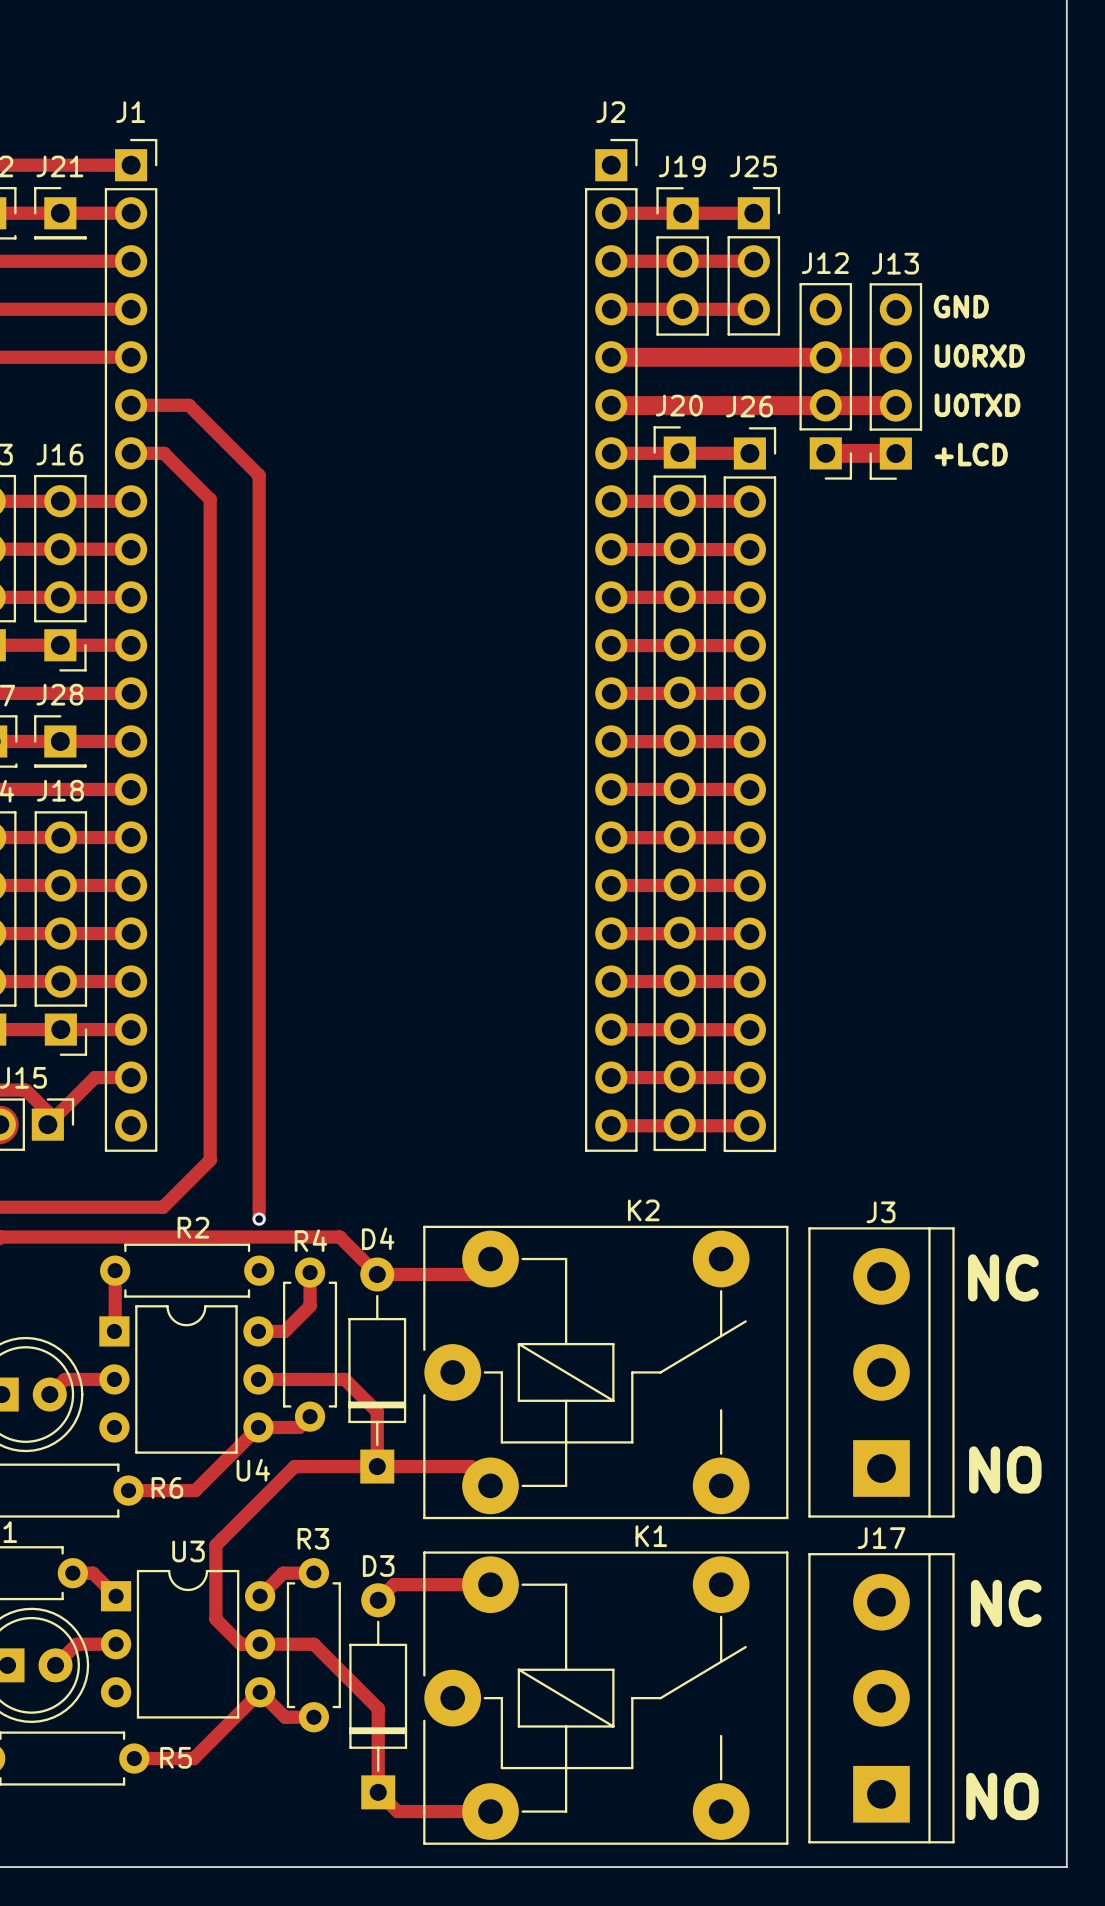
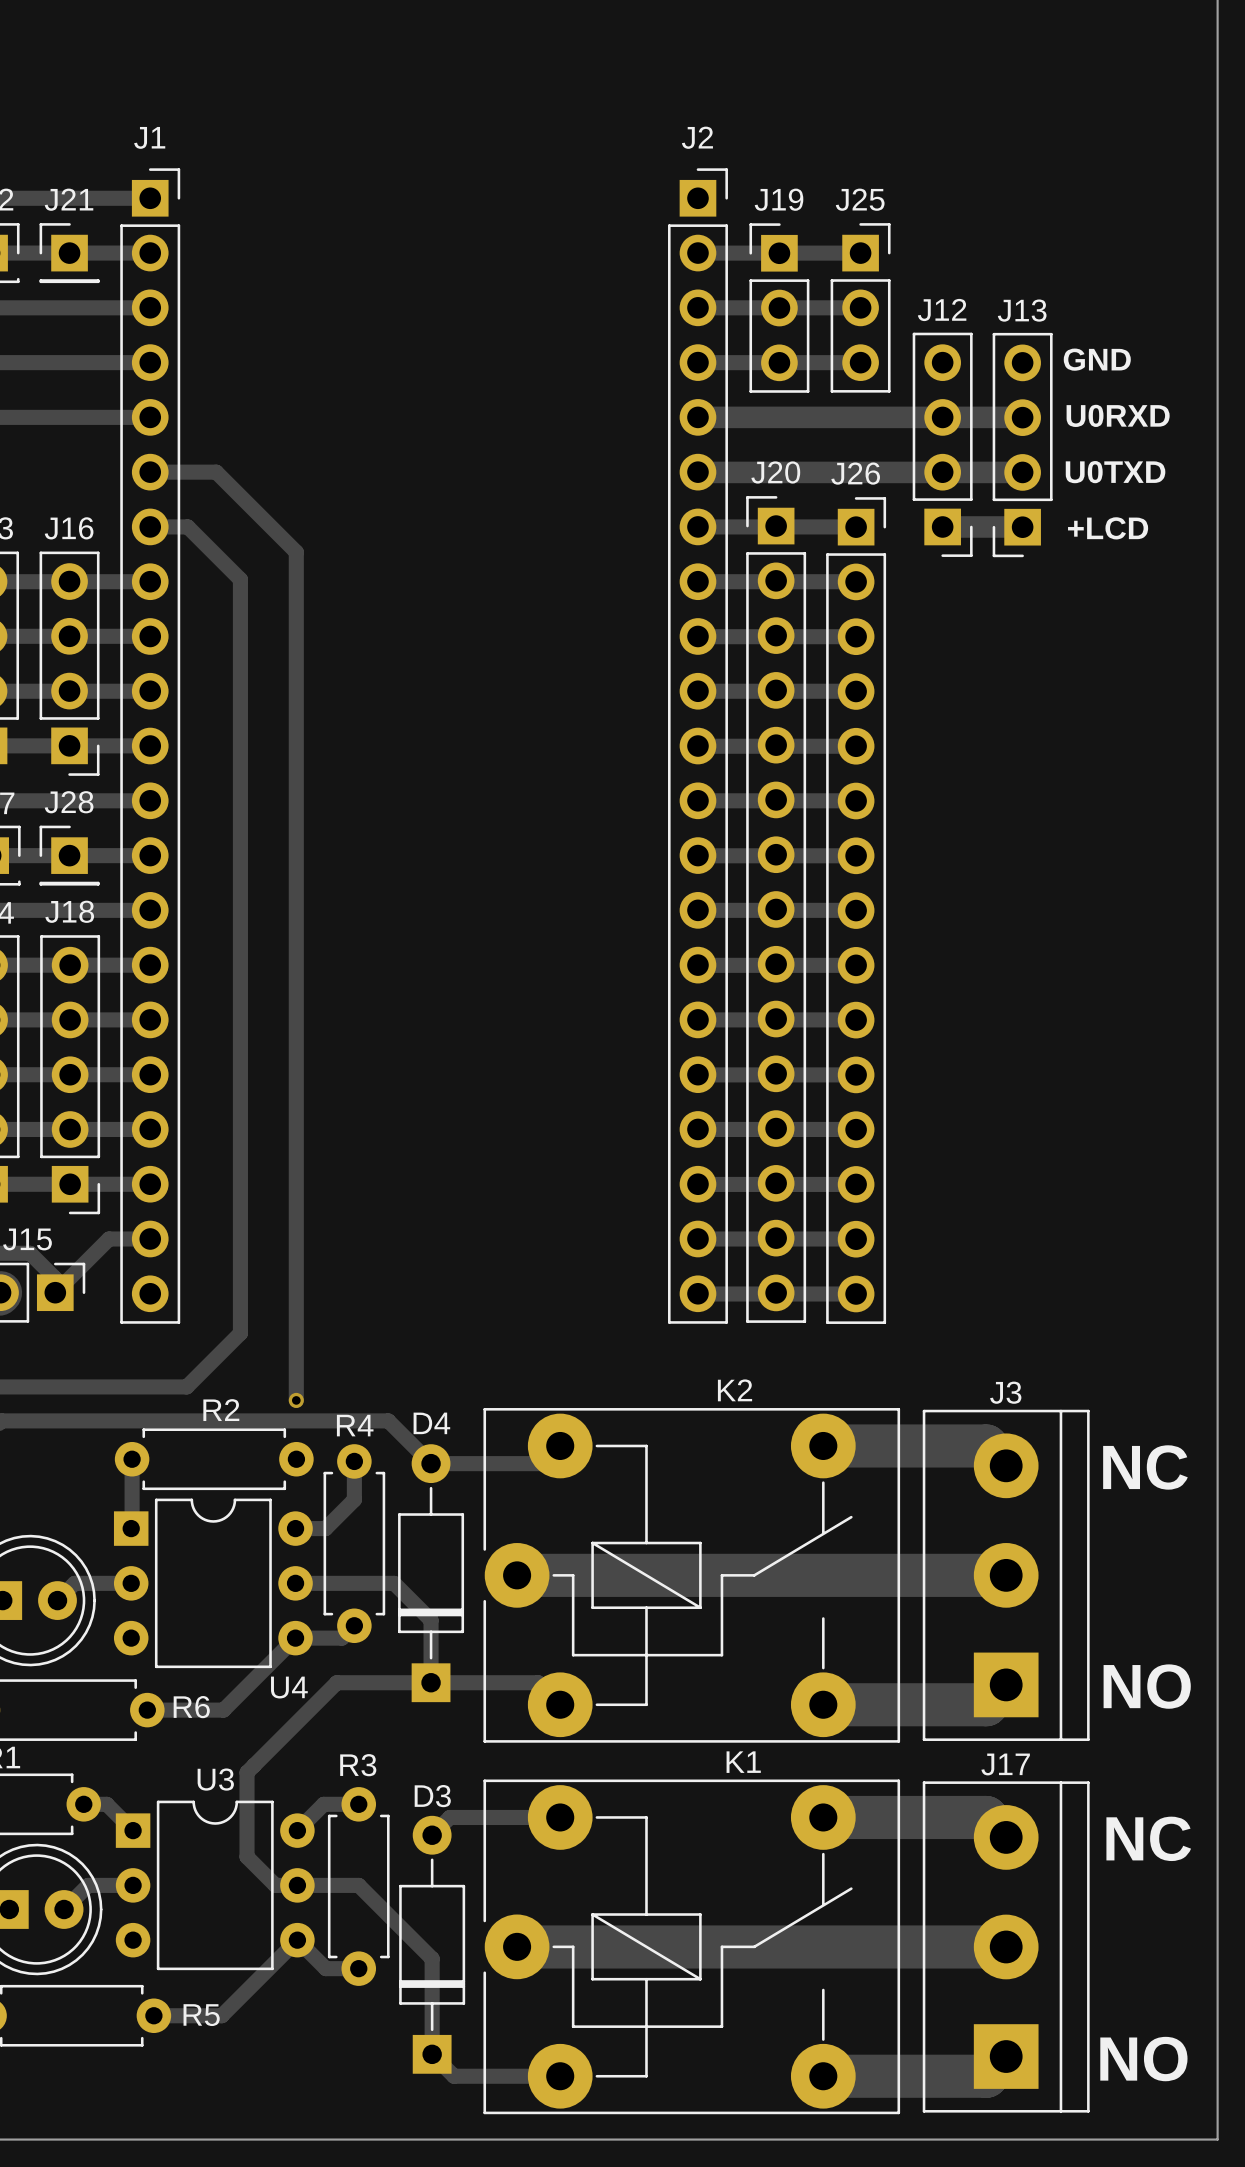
track: none -> (823, 1445) (986, 1445) (1006, 1465)
track: none -> (517, 1575) (1006, 1575)
track: none -> (1006, 1684) (986, 1704) (823, 1704)
track: none -> (823, 1817) (986, 1817) (1006, 1837)
track: none -> (517, 1946) (1006, 1946)
track: none -> (1006, 2056) (986, 2076) (823, 2076)

